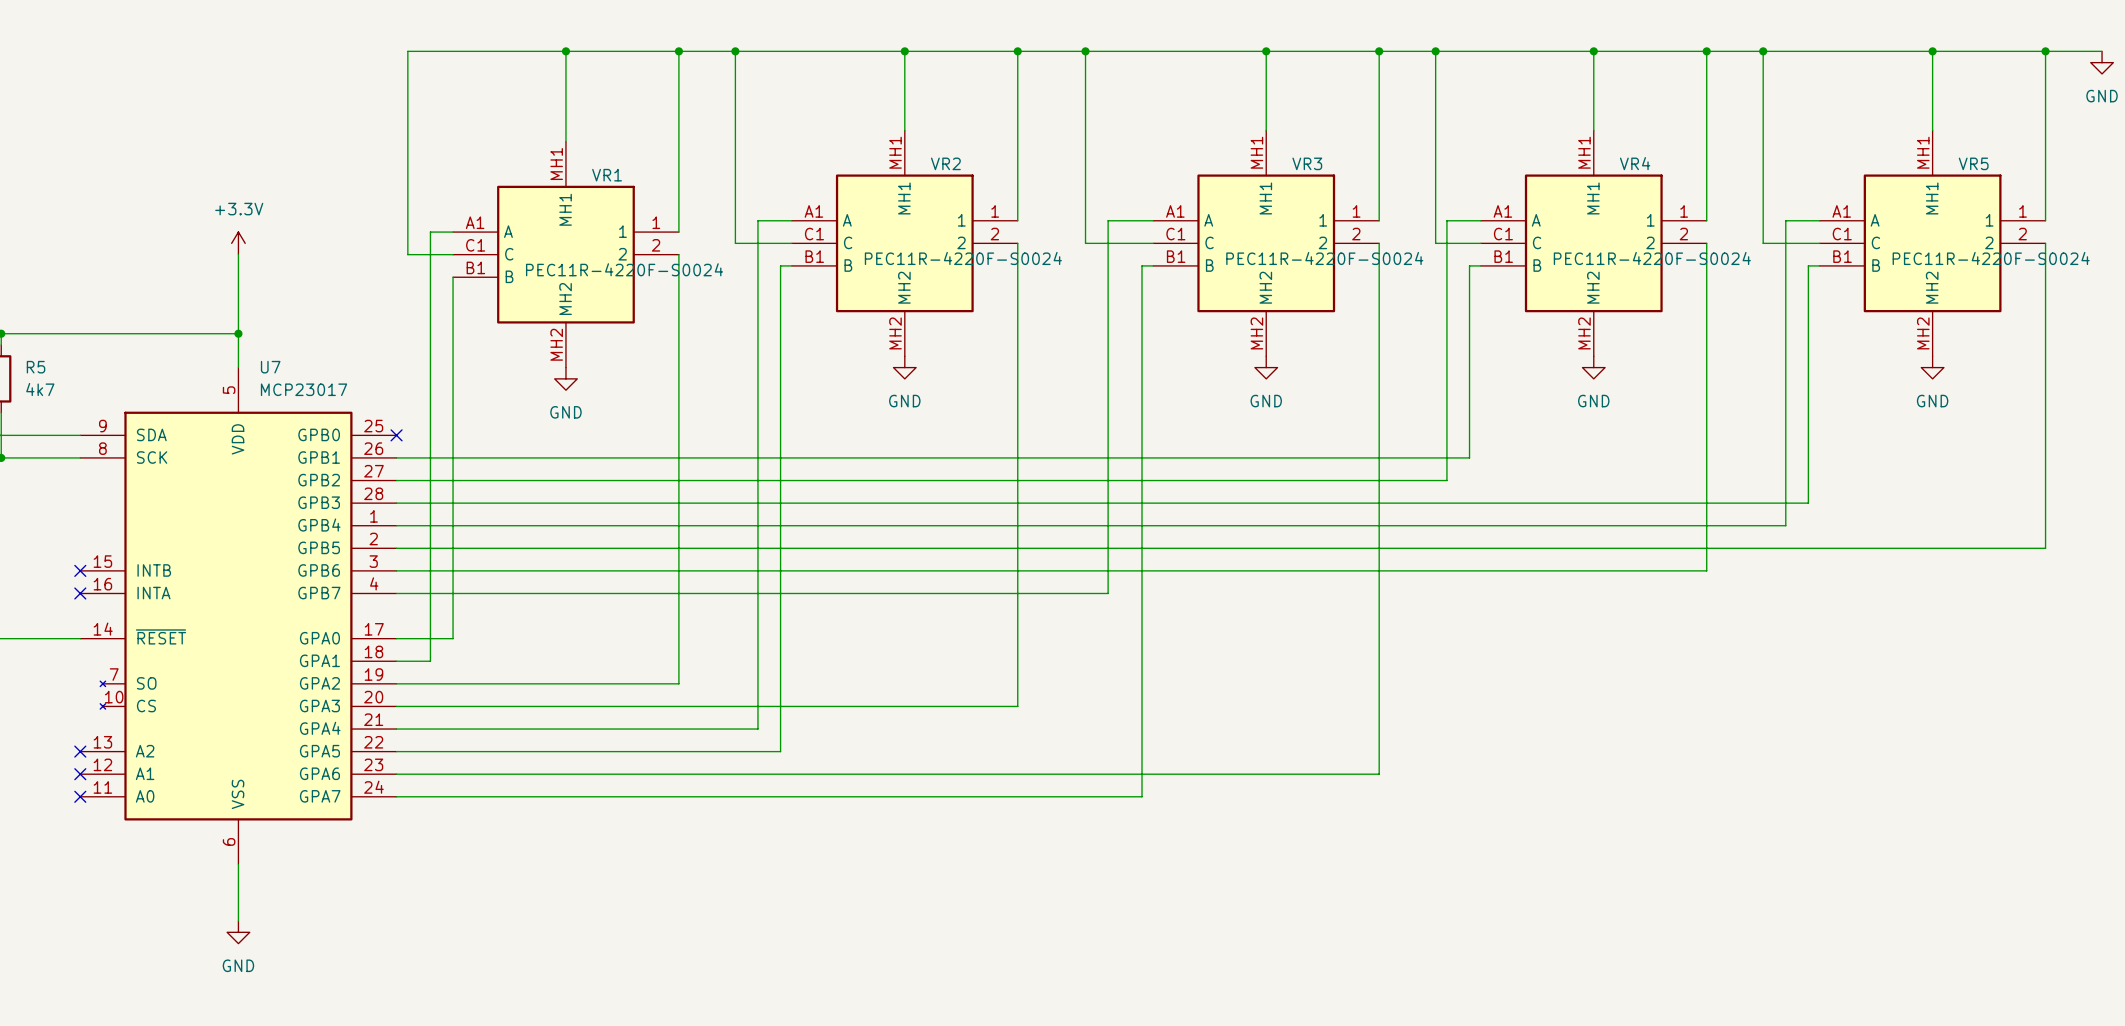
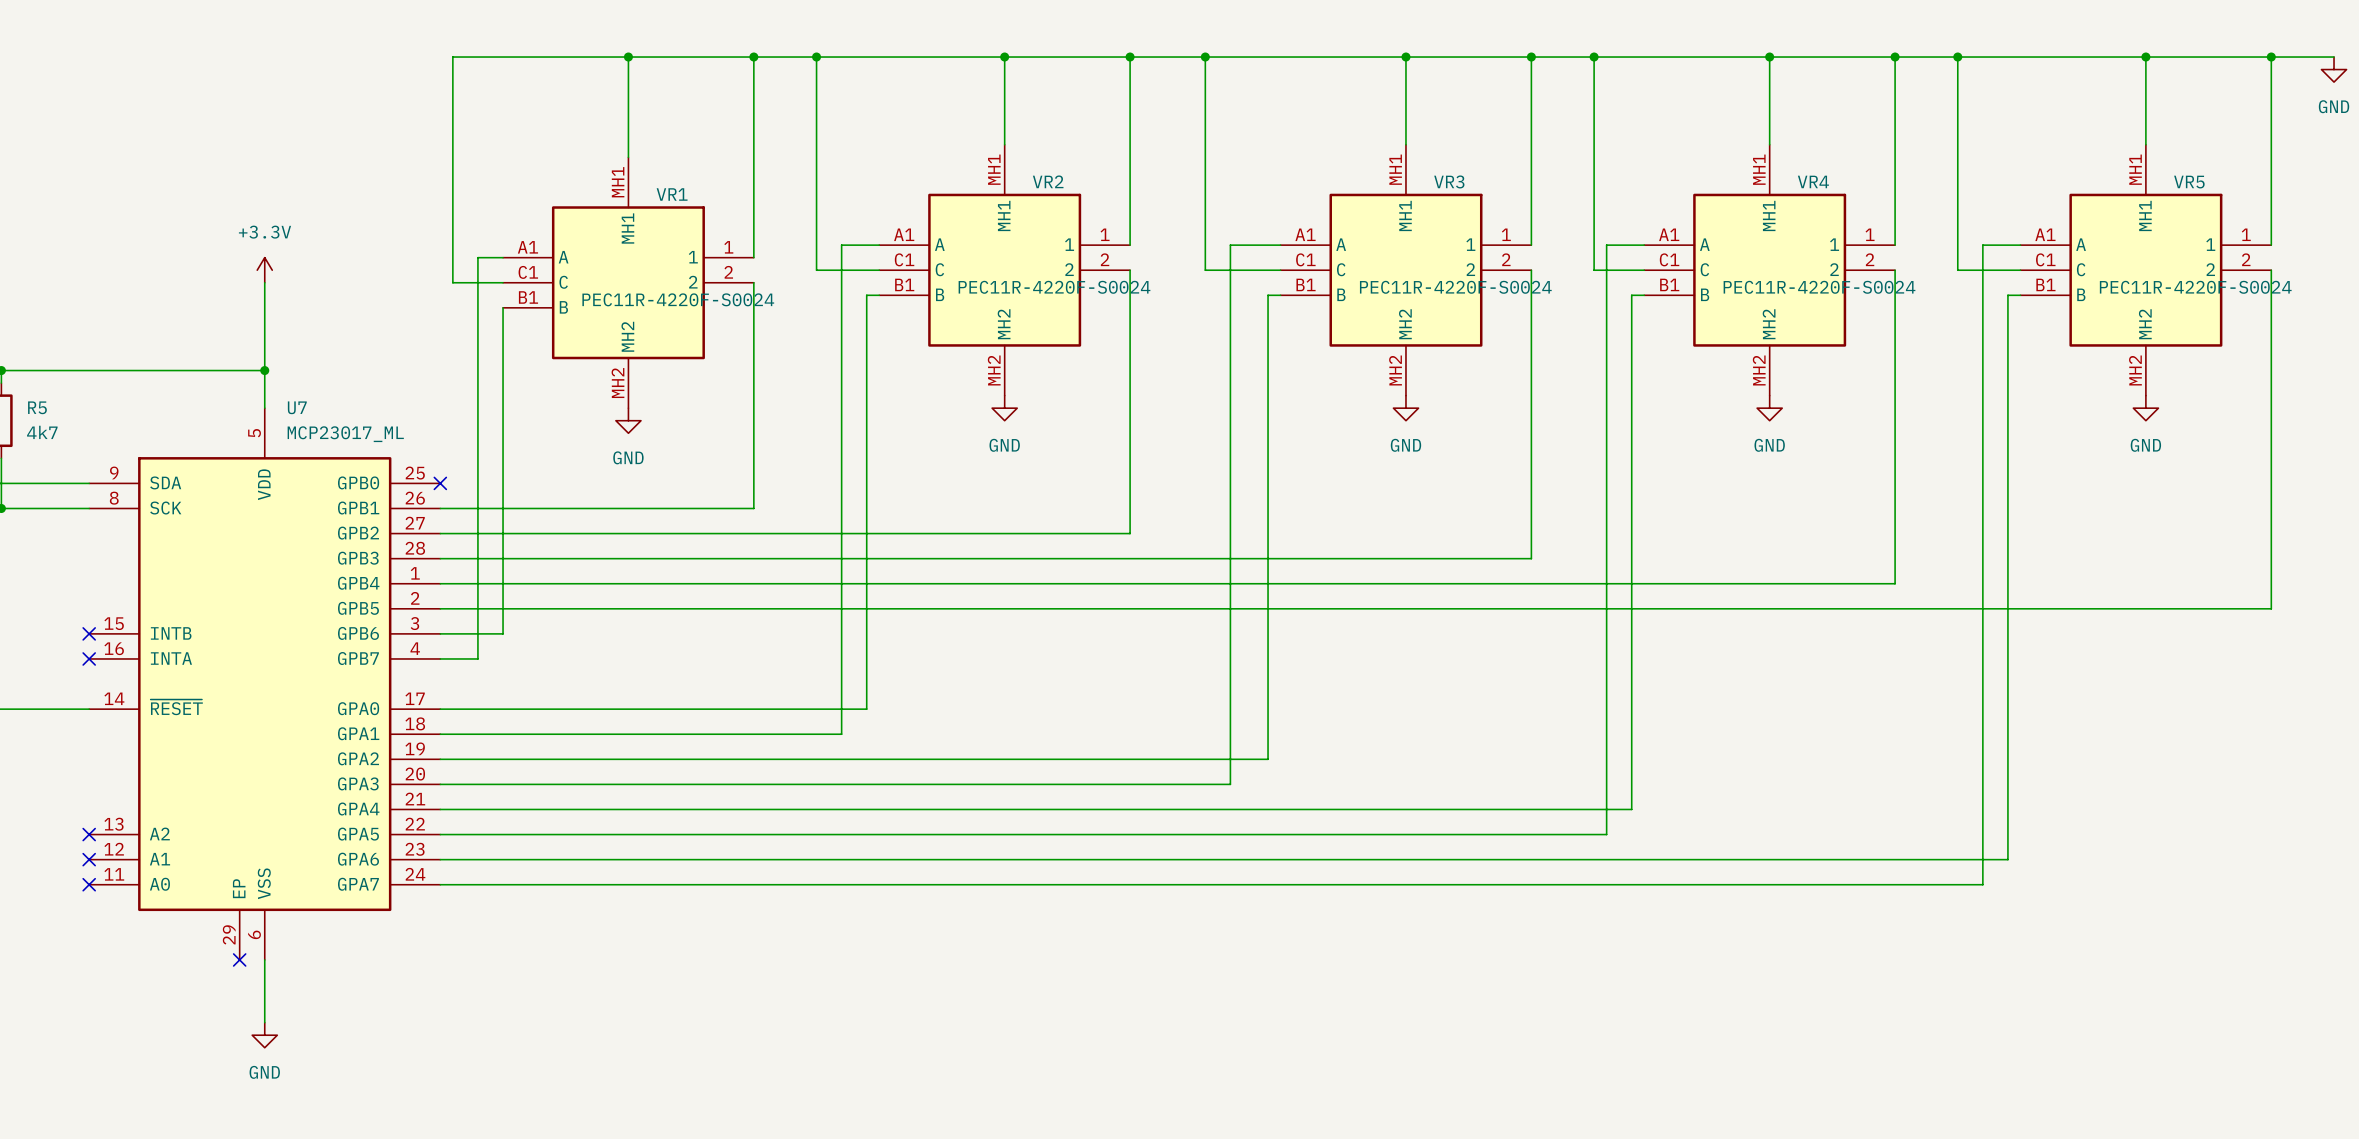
U7 symbol: [80, 367, 397, 865] -> [89, 408, 441, 960]
U7 value: MCP23017 (304, 389) -> MCP23017_ML (345, 434)
wire: (1469, 457) (678, 457) (678, 683) -> (1631, 508) (1631, 809) (841, 809)
wire: (1446, 480) (1017, 480) (1017, 706) -> (1606, 533) (1606, 834) (866, 834)
wire: (1808, 503) (1379, 503) (1379, 774) -> (2007, 558) (2007, 859) (1531, 859)
wire: (1785, 525) (1706, 525) (1706, 570) (453, 570) (453, 638) -> (1982, 583) (1982, 884) (1268, 884)
wire: (1108, 593) (430, 593) (430, 661) -> (1230, 658) (1230, 784) (1130, 784)
wire: (780, 638) (780, 751) -> (866, 709) (503, 709)
wire: (757, 661) (757, 729) -> (841, 734) (477, 734)
wire: (1142, 683) (1142, 796) -> (1268, 759) (753, 759)
no-connect mark: none -> (239, 959)

